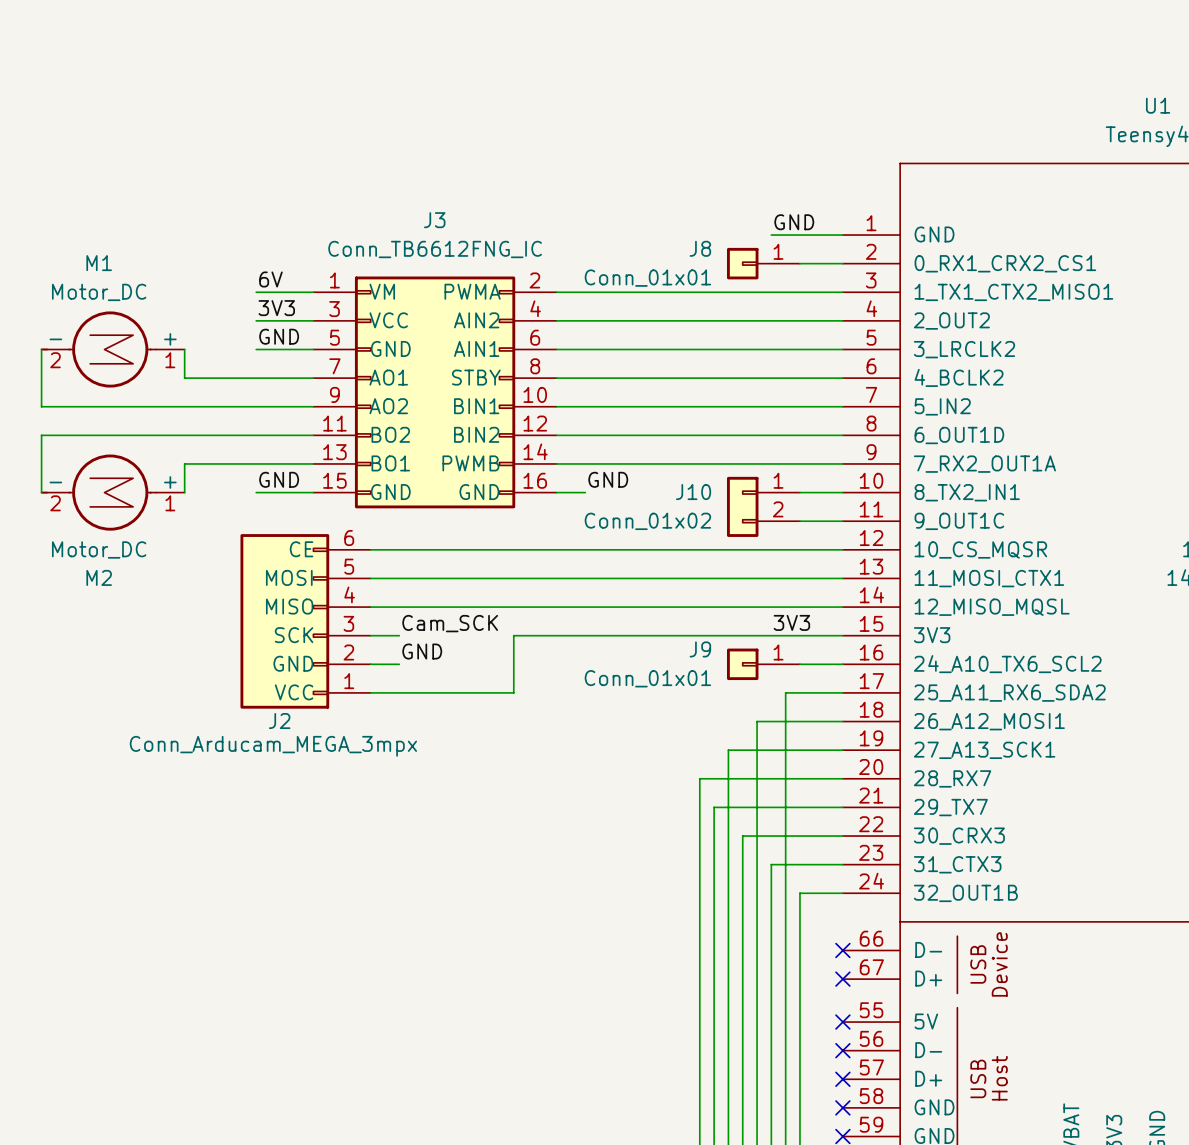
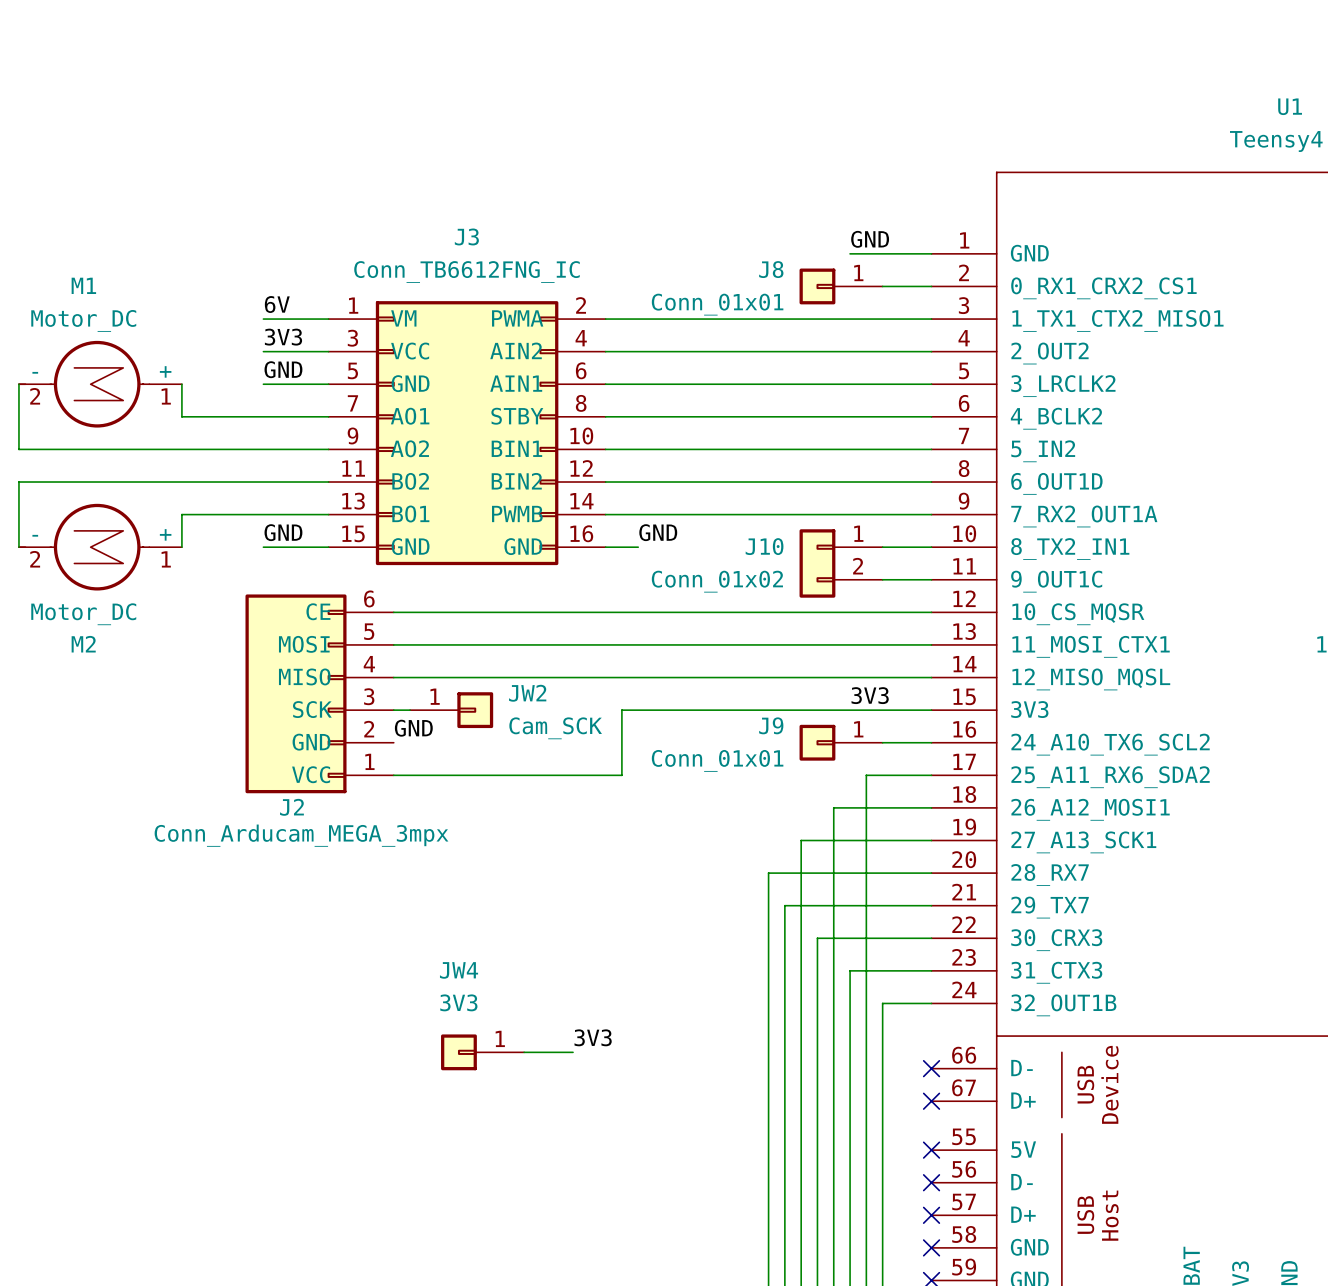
label: Cam_SCK (450, 623) -> none
JW2: none -> Cam_SCK (451, 710)
wire: (571, 635) (513, 635) (513, 692) -> (621, 710) (621, 775) (556, 775)
label position: GND (422, 651) -> GND (413, 728)
wire: (370, 664) (399, 664) -> none
label: none -> 3V3 (593, 1037)
JW4: none -> 3V3 (482, 1052)
wire: none -> (524, 1052) (573, 1052)

